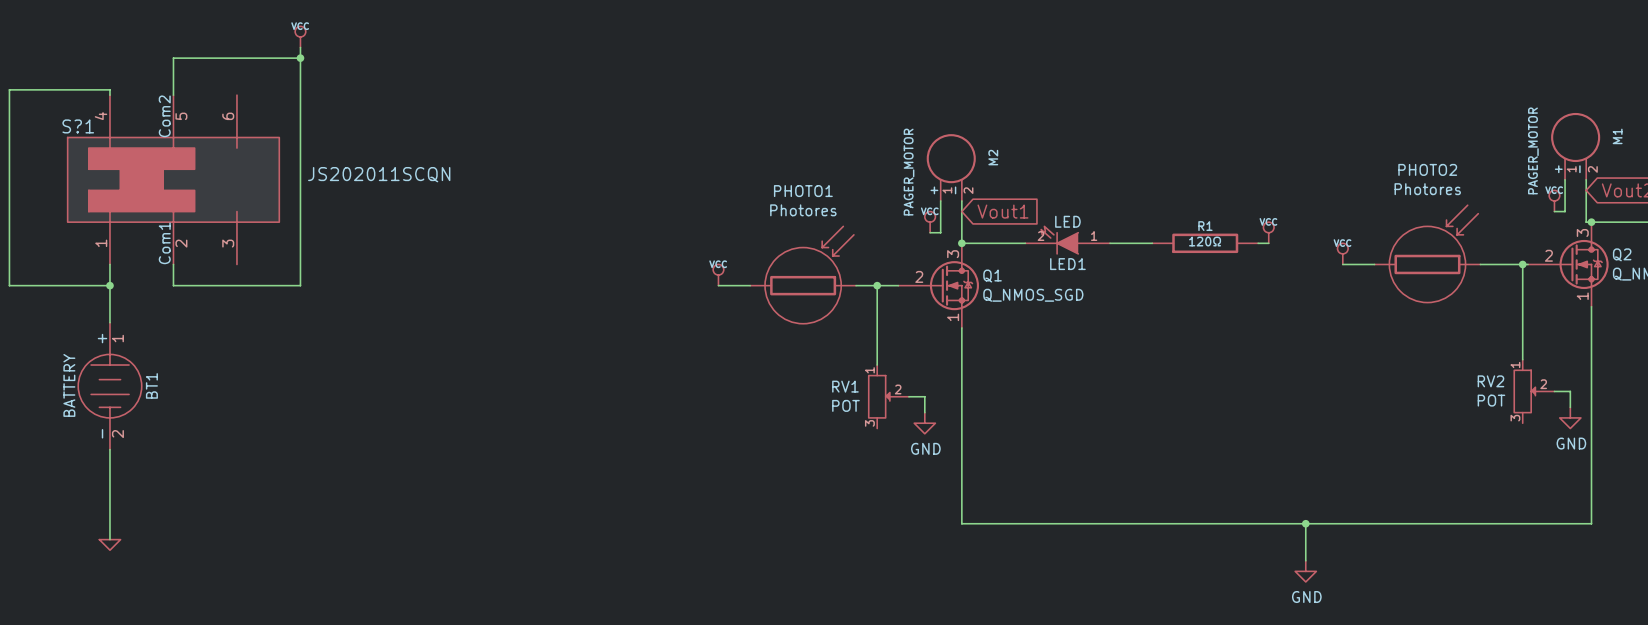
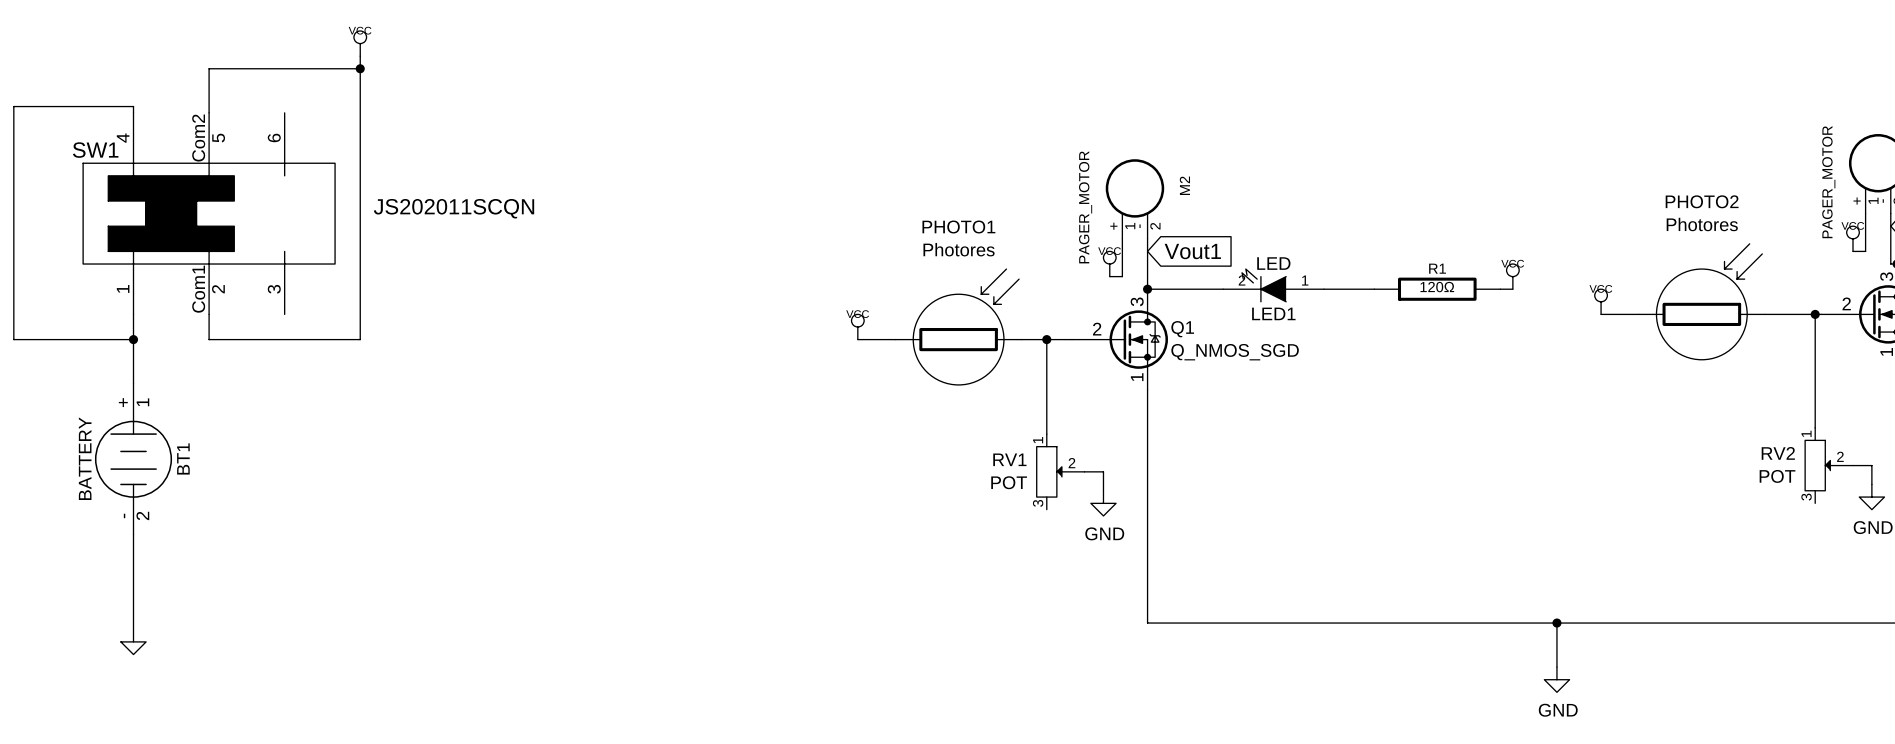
S?1 name: S?1 (78, 126) -> SW1 (95, 150)

